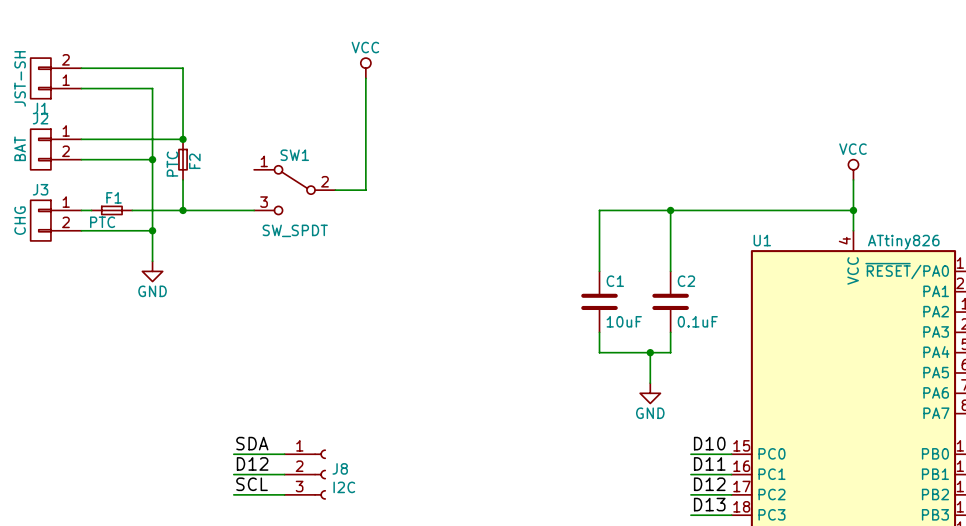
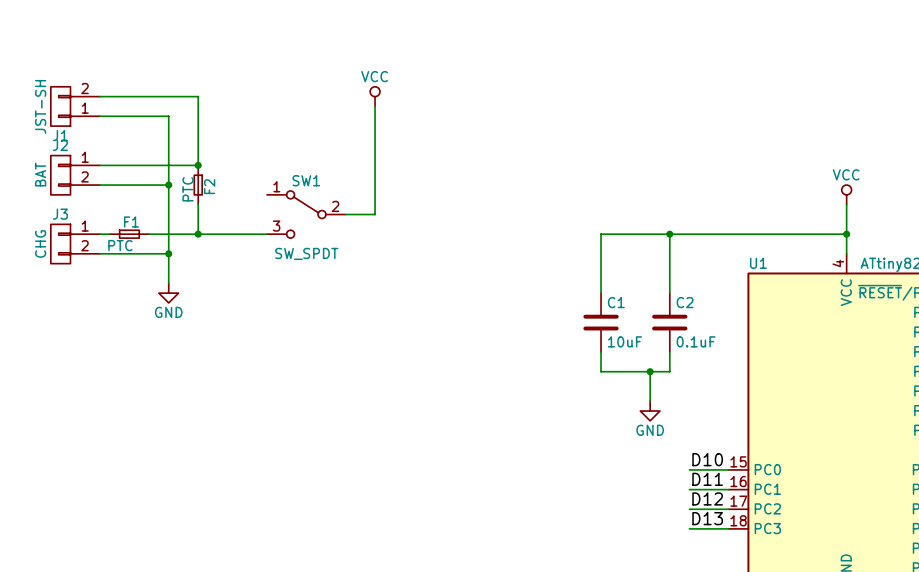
label: SDA (252, 443) -> none
wire: (233, 454) (284, 454) -> none
label: D12 (252, 463) -> none
wire: (233, 474) (284, 474) -> none
J8: I2C (305, 474) -> none
label: SCL (252, 484) -> none
wire: (233, 494) (284, 494) -> none

